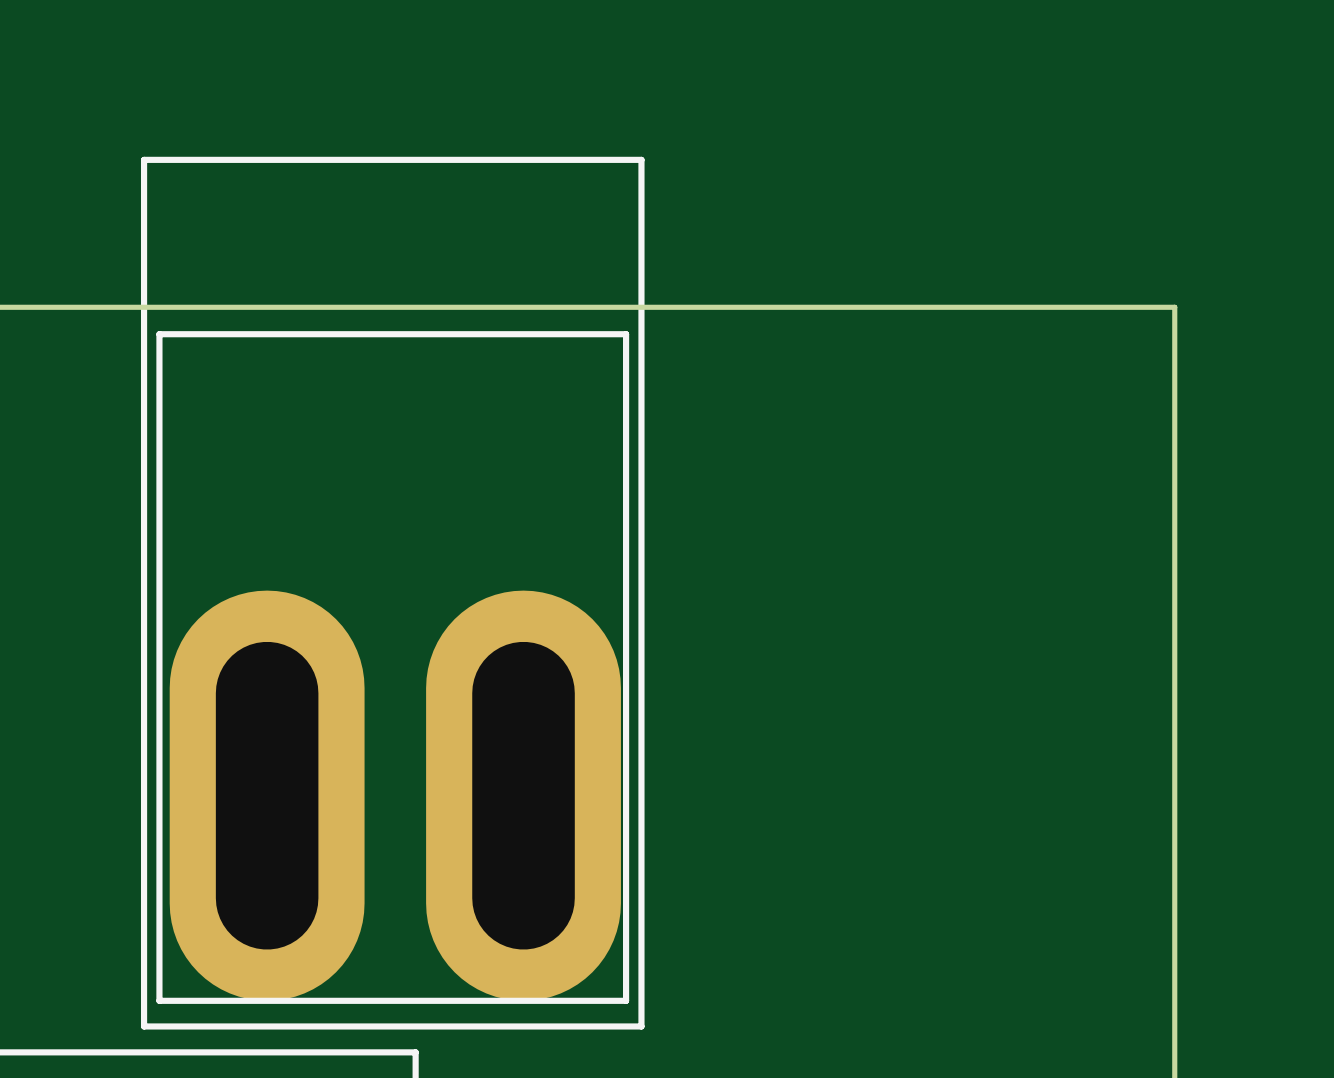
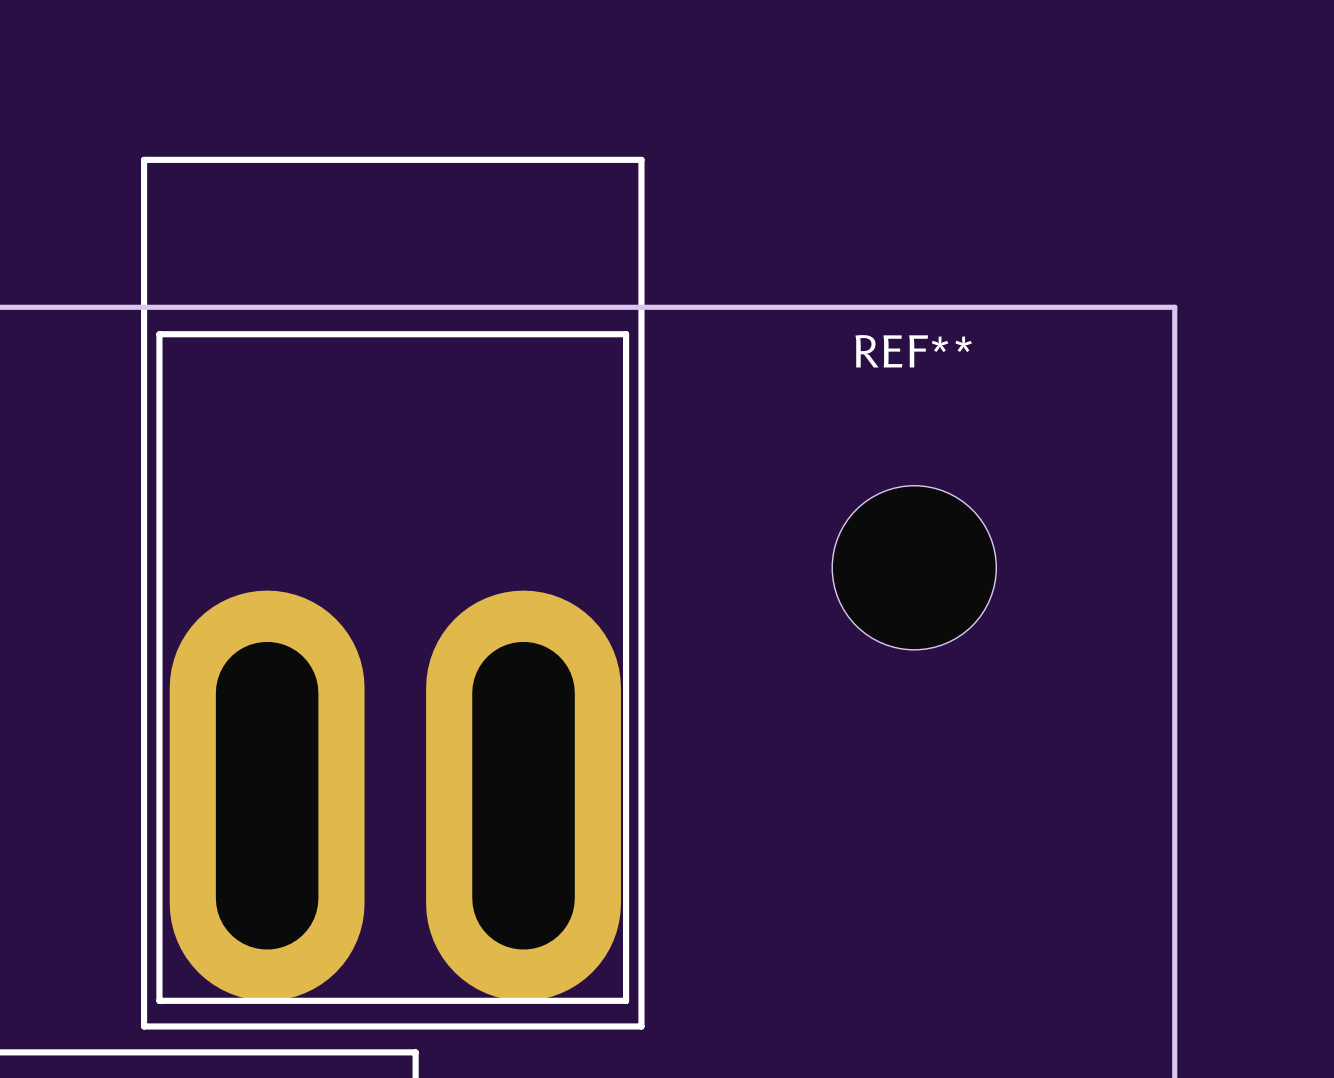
REF**: none -> (914, 567)

